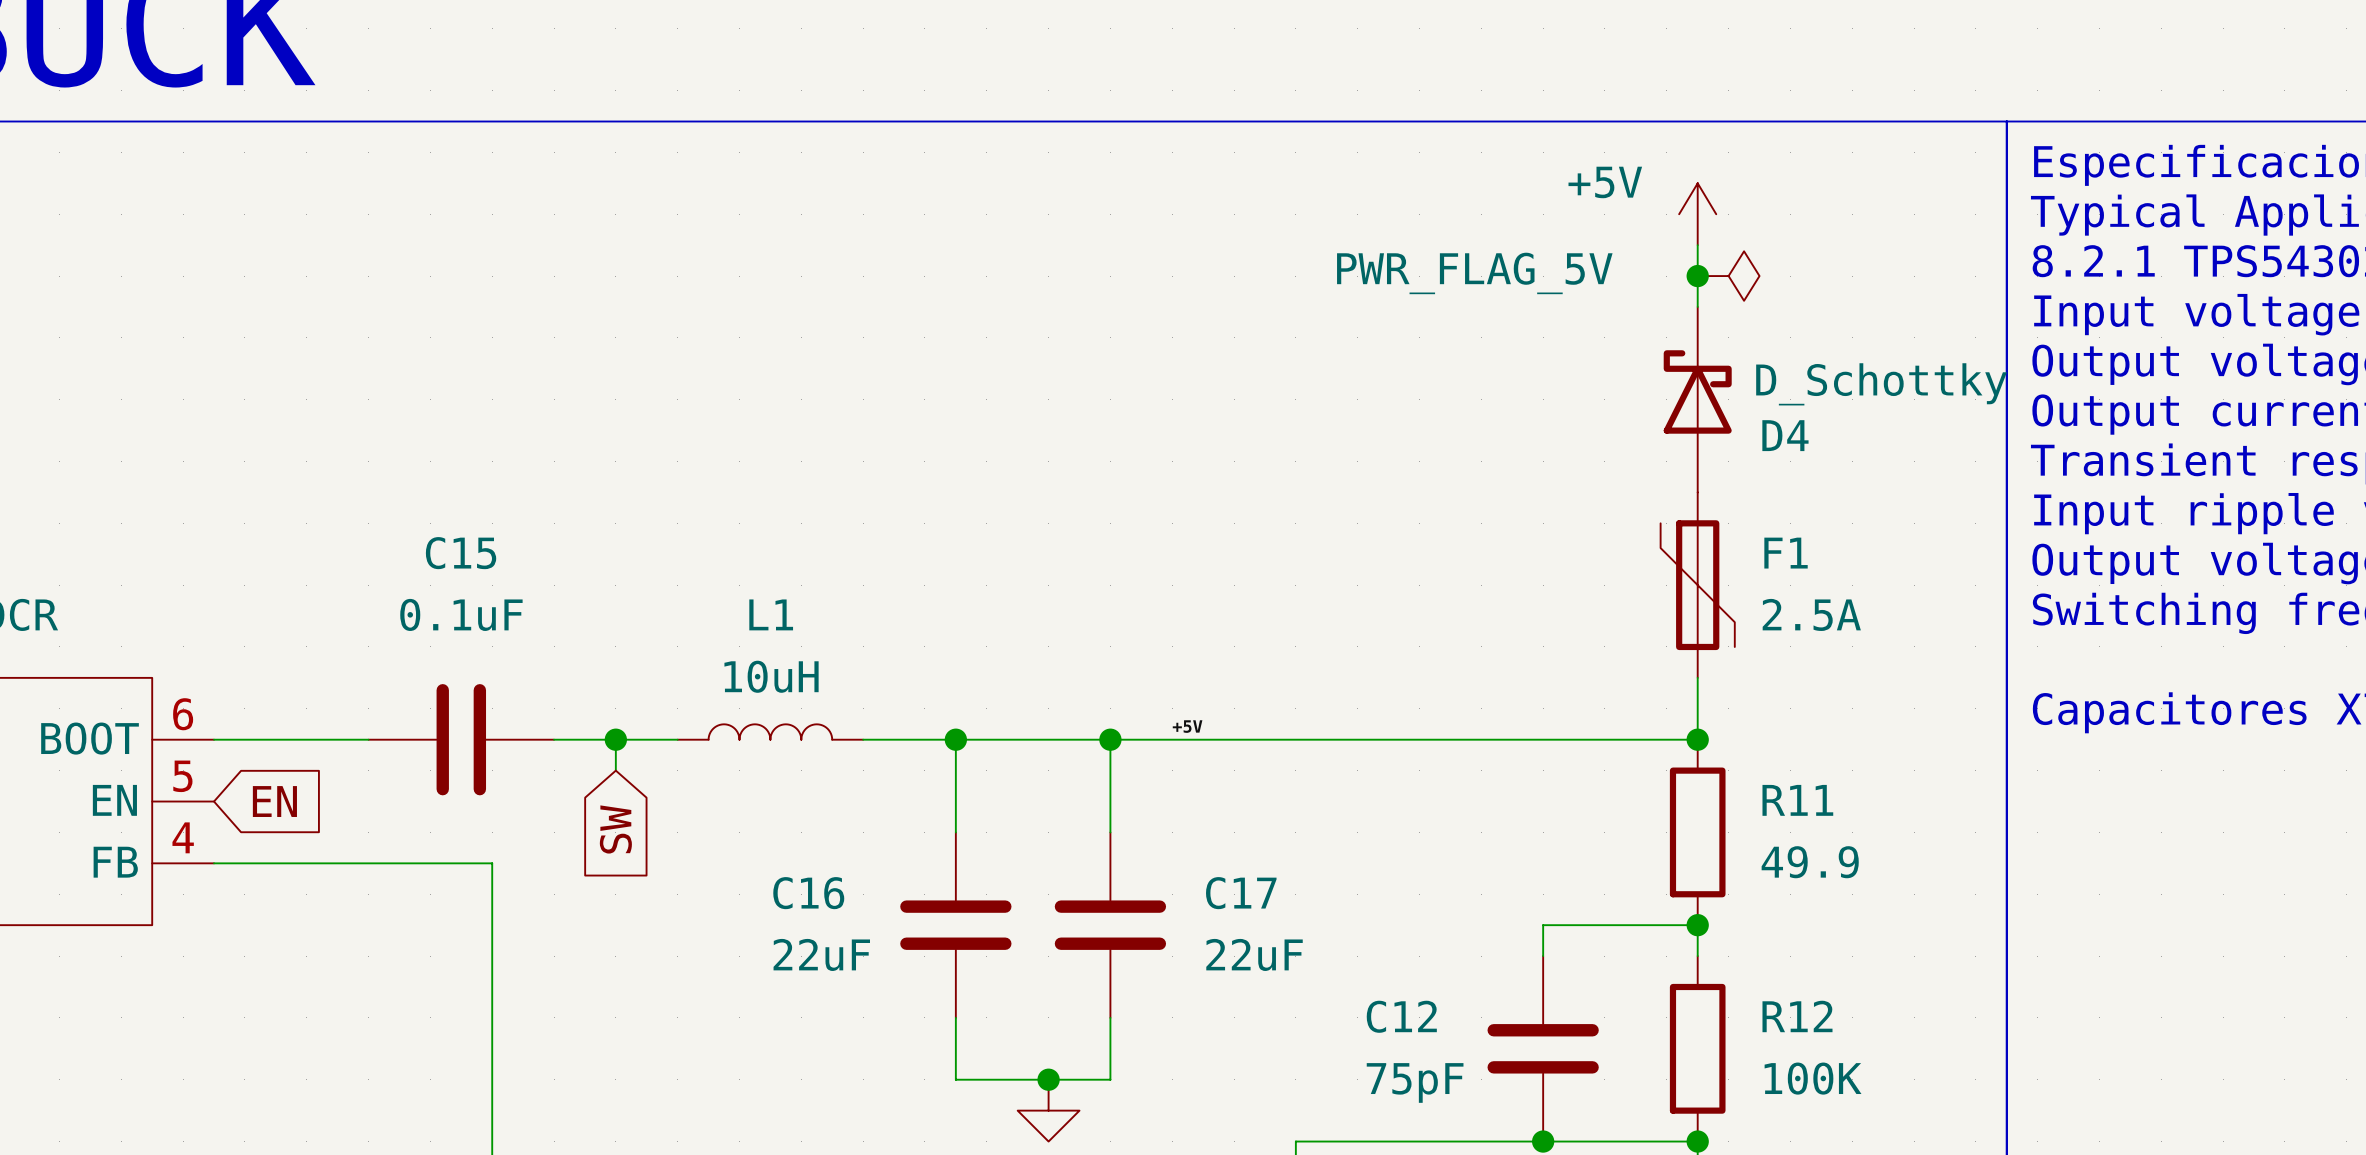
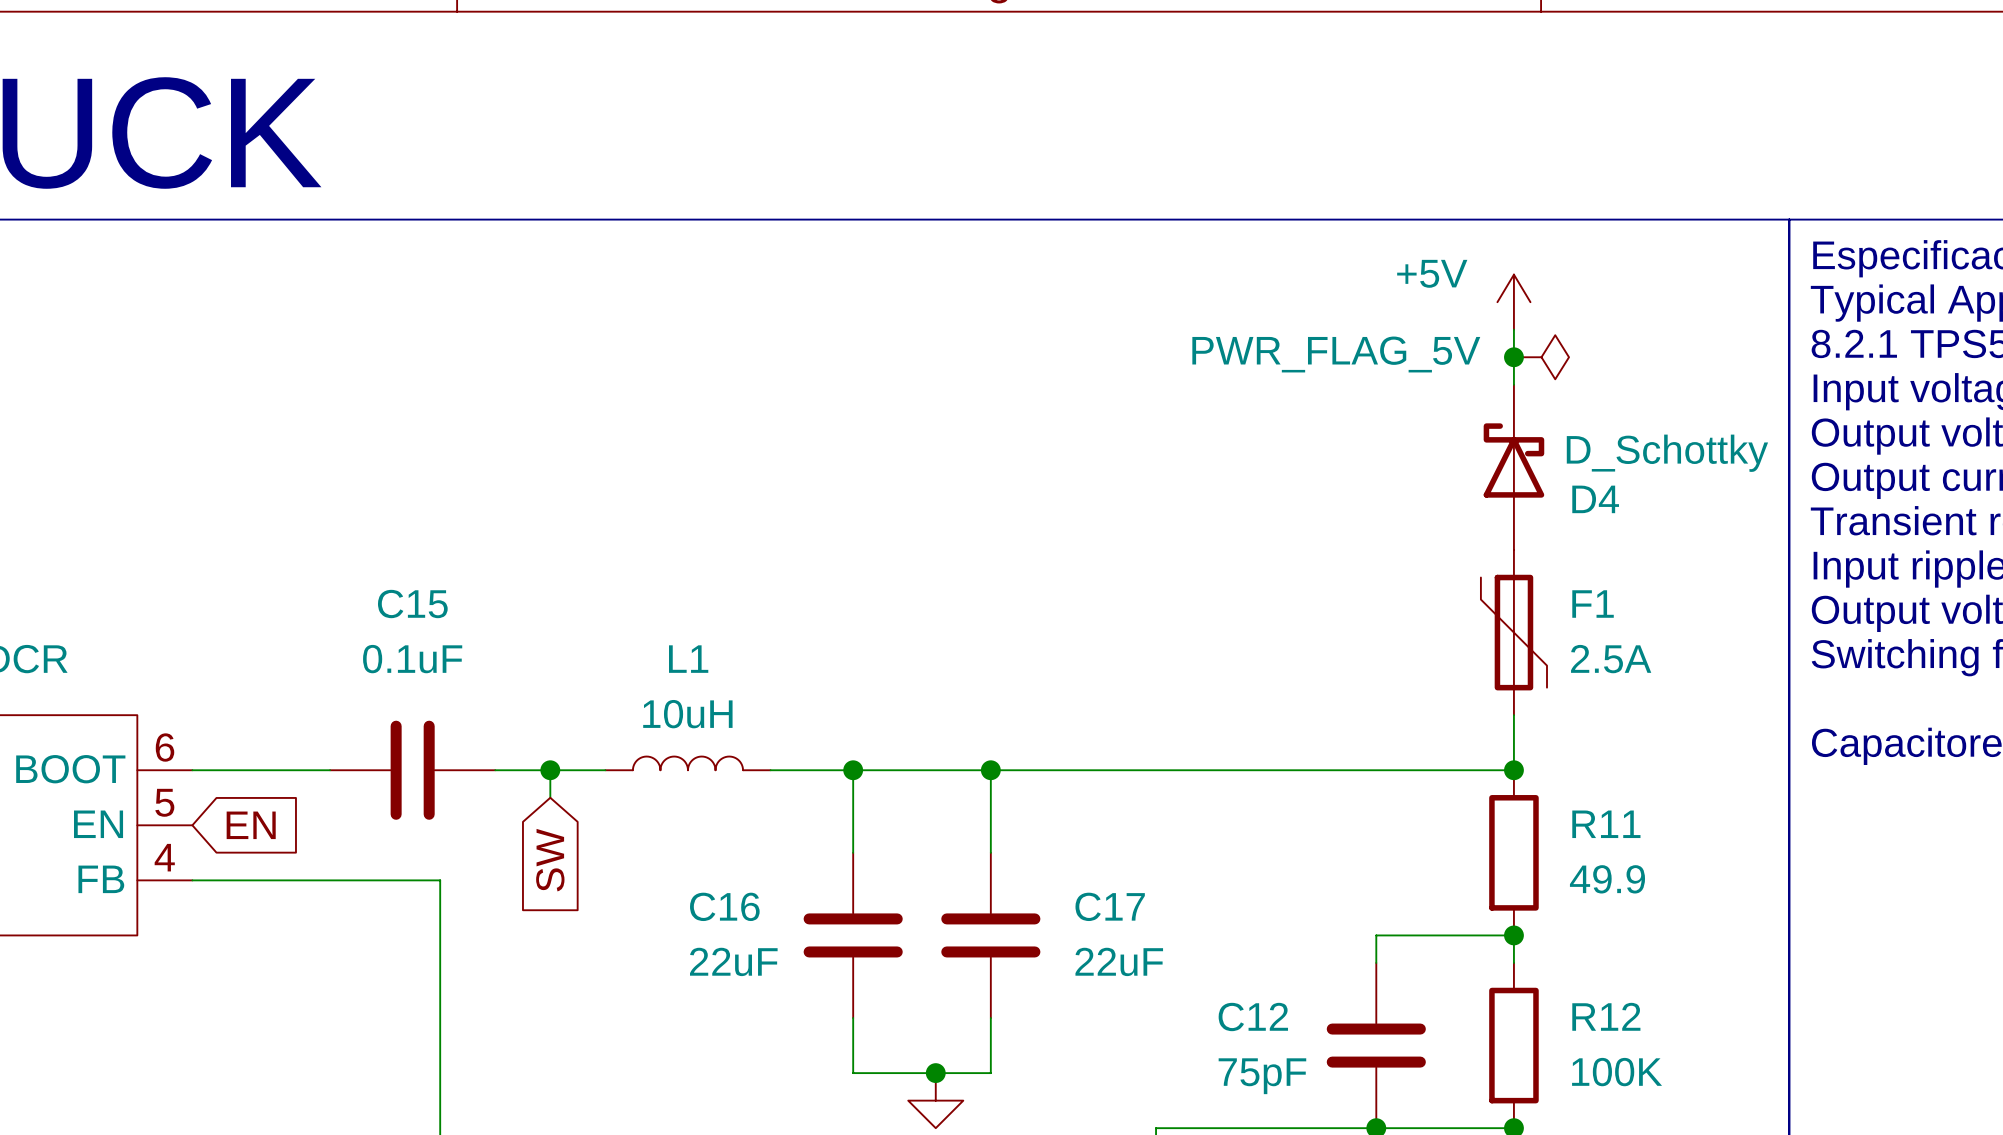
label: +5V (1187, 726) -> none

